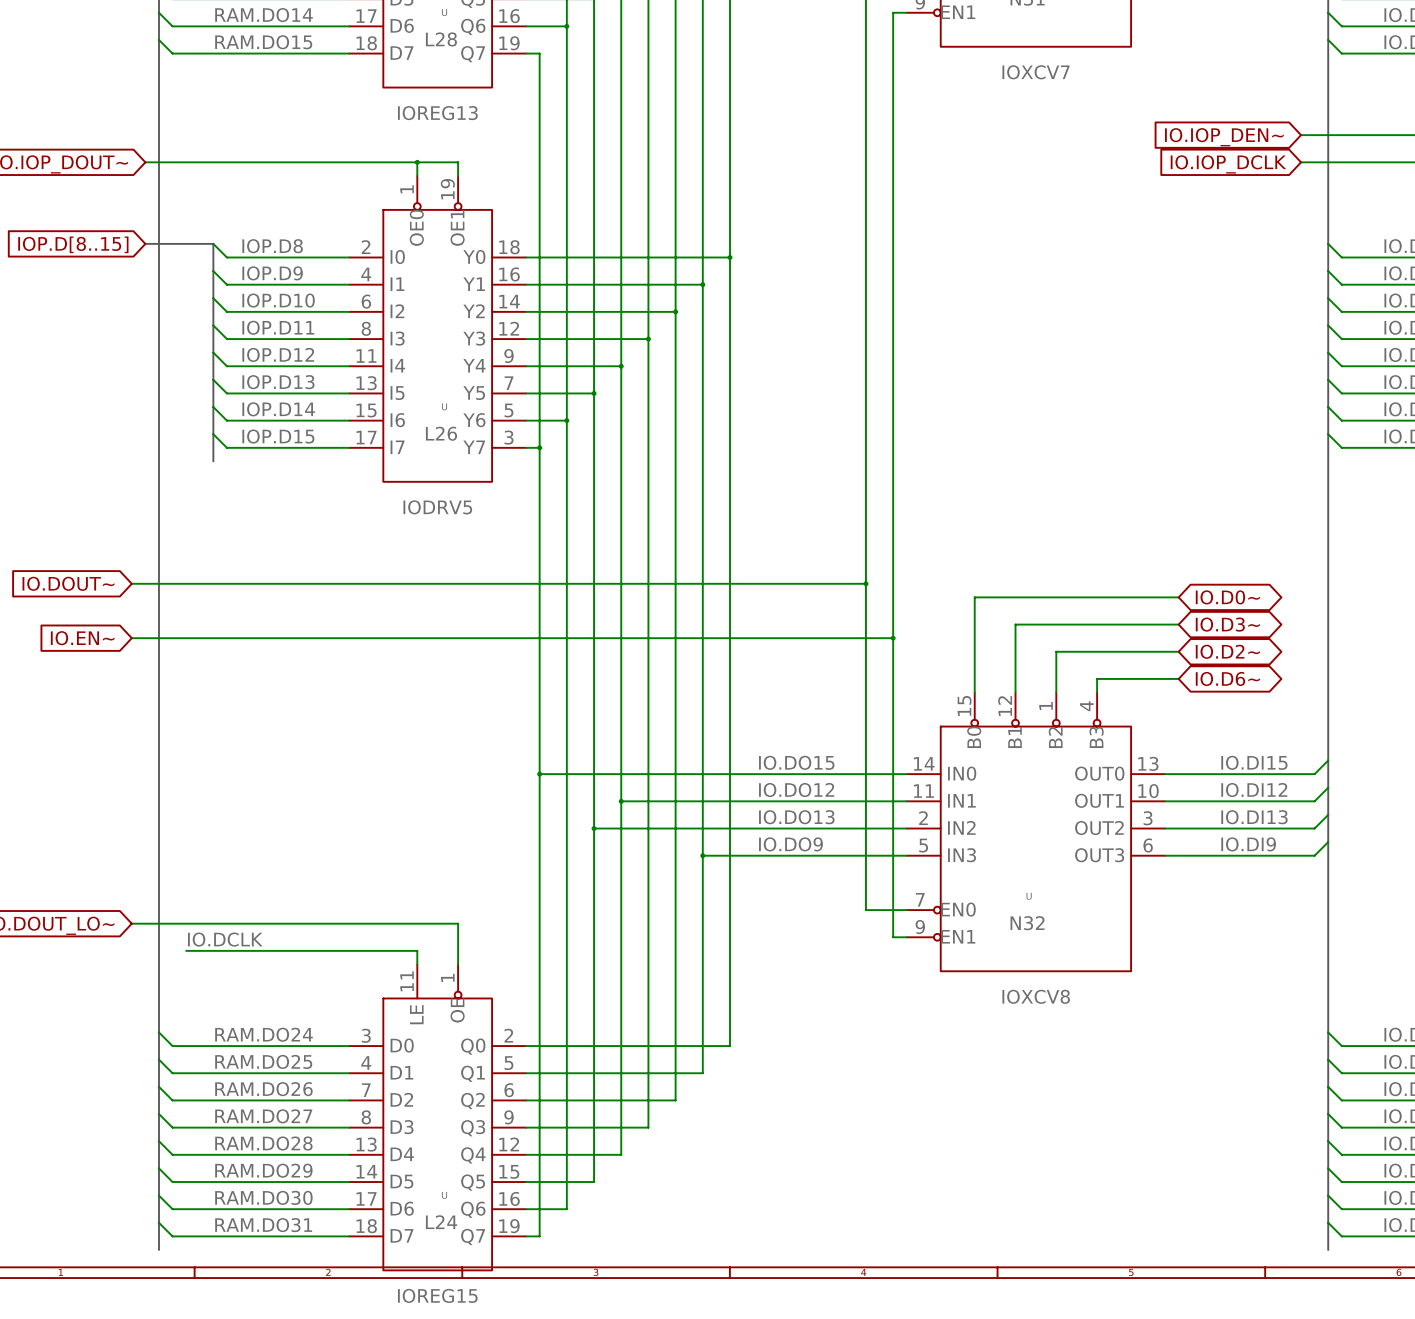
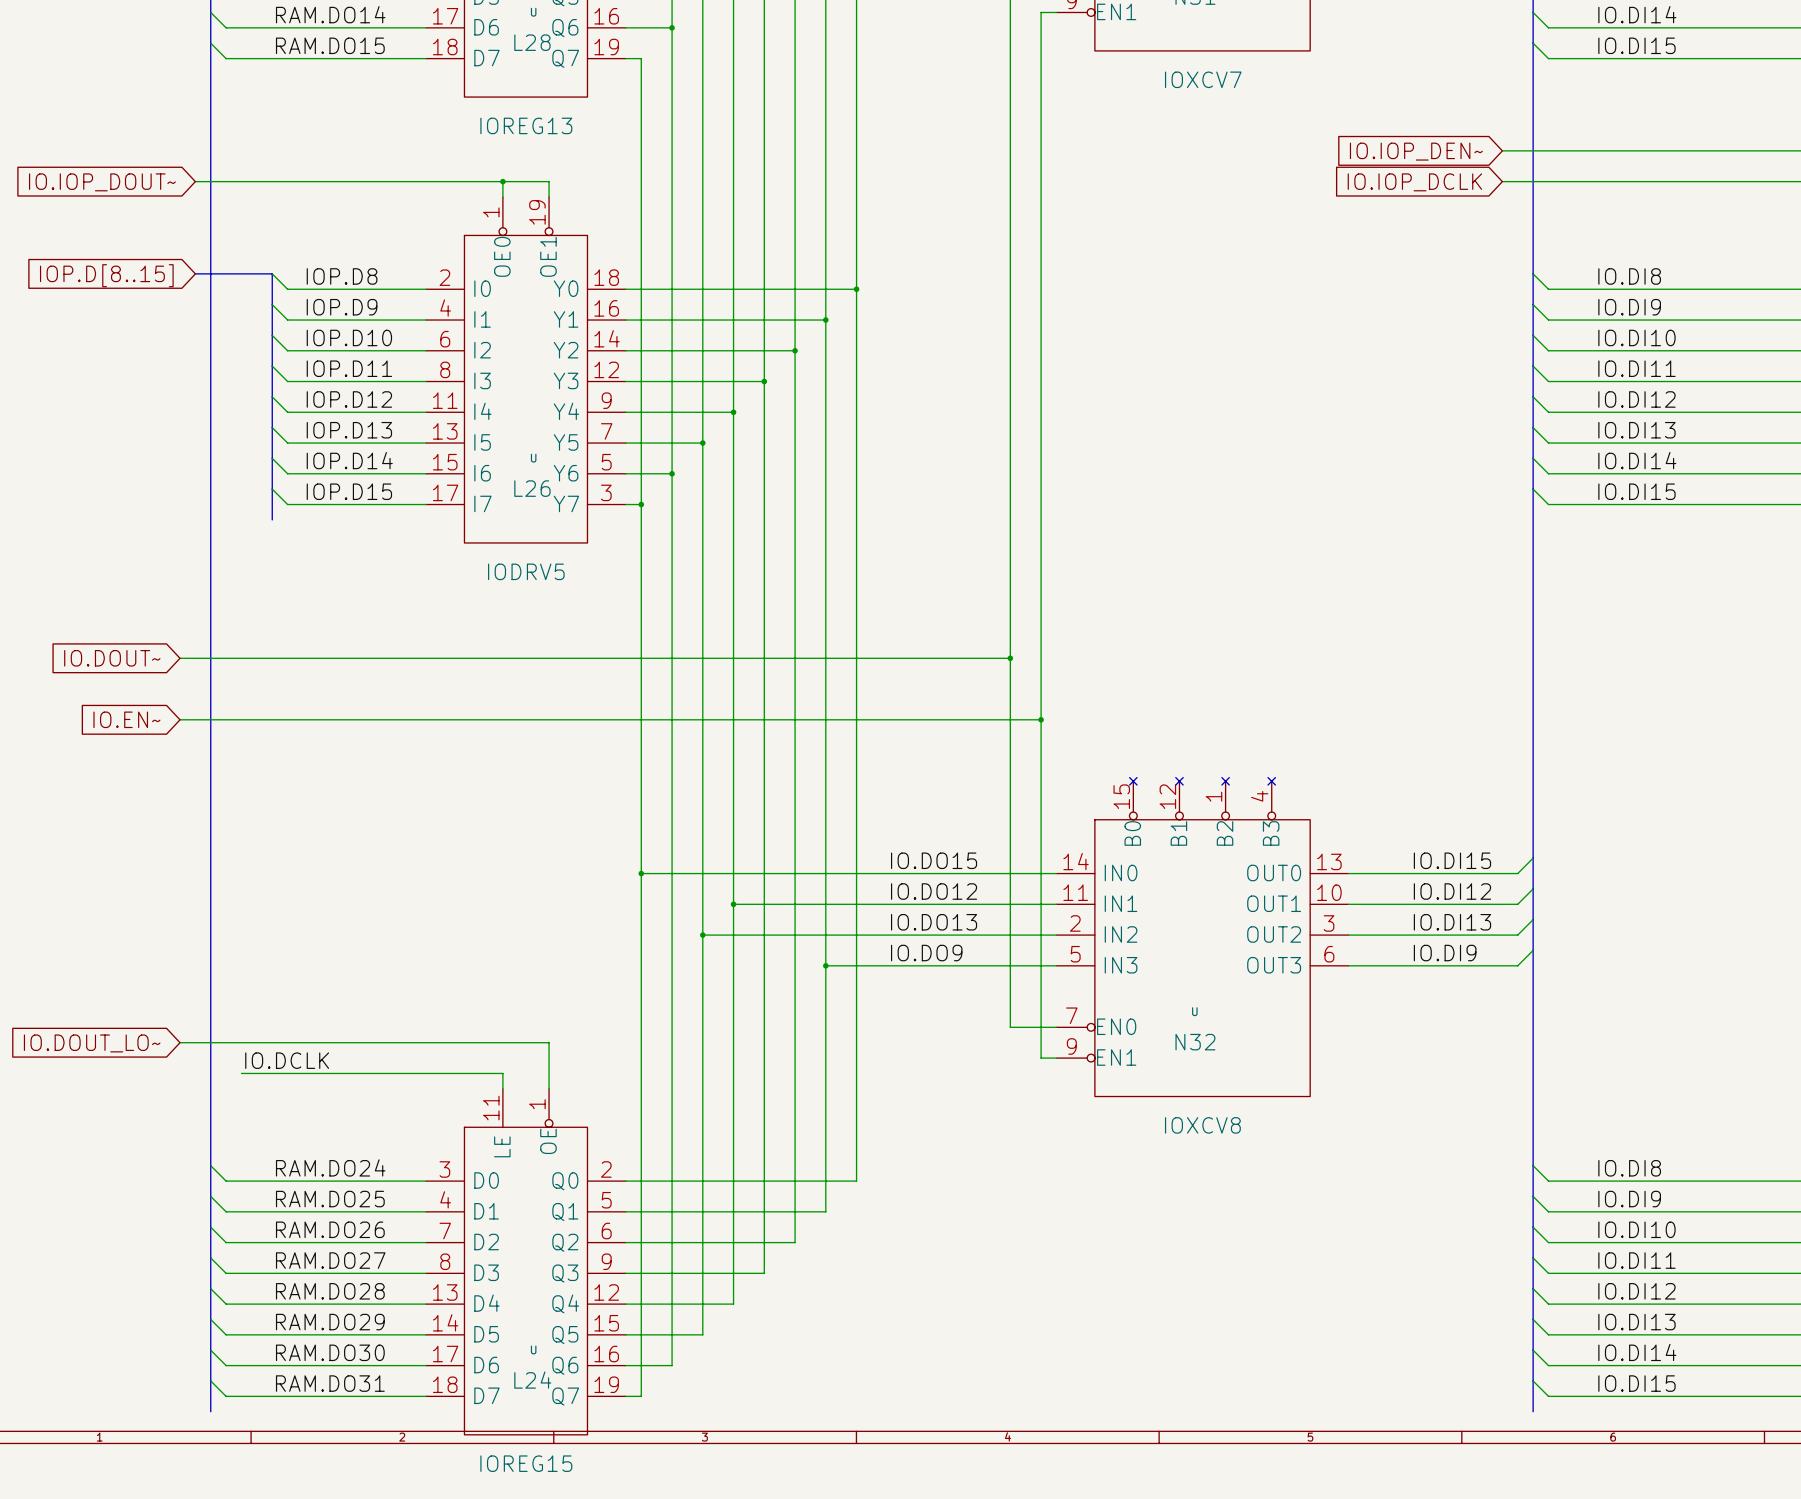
wire: (1178, 597) (974, 597) (974, 692) -> none
global label: IO.D0~ (1227, 597) -> none
wire: (1178, 624) (1015, 624) (1015, 692) -> none
global label: IO.D3~ (1227, 624) -> none
wire: (1178, 651) (1056, 651) (1056, 692) -> none
global label: IO.D2~ (1227, 651) -> none
wire: (1178, 678) (1097, 678) (1097, 692) -> none
global label: IO.D6~ (1227, 678) -> none
no-connect mark: none -> (1133, 781)
no-connect mark: none -> (1179, 781)
no-connect mark: none -> (1225, 781)
no-connect mark: none -> (1271, 781)

